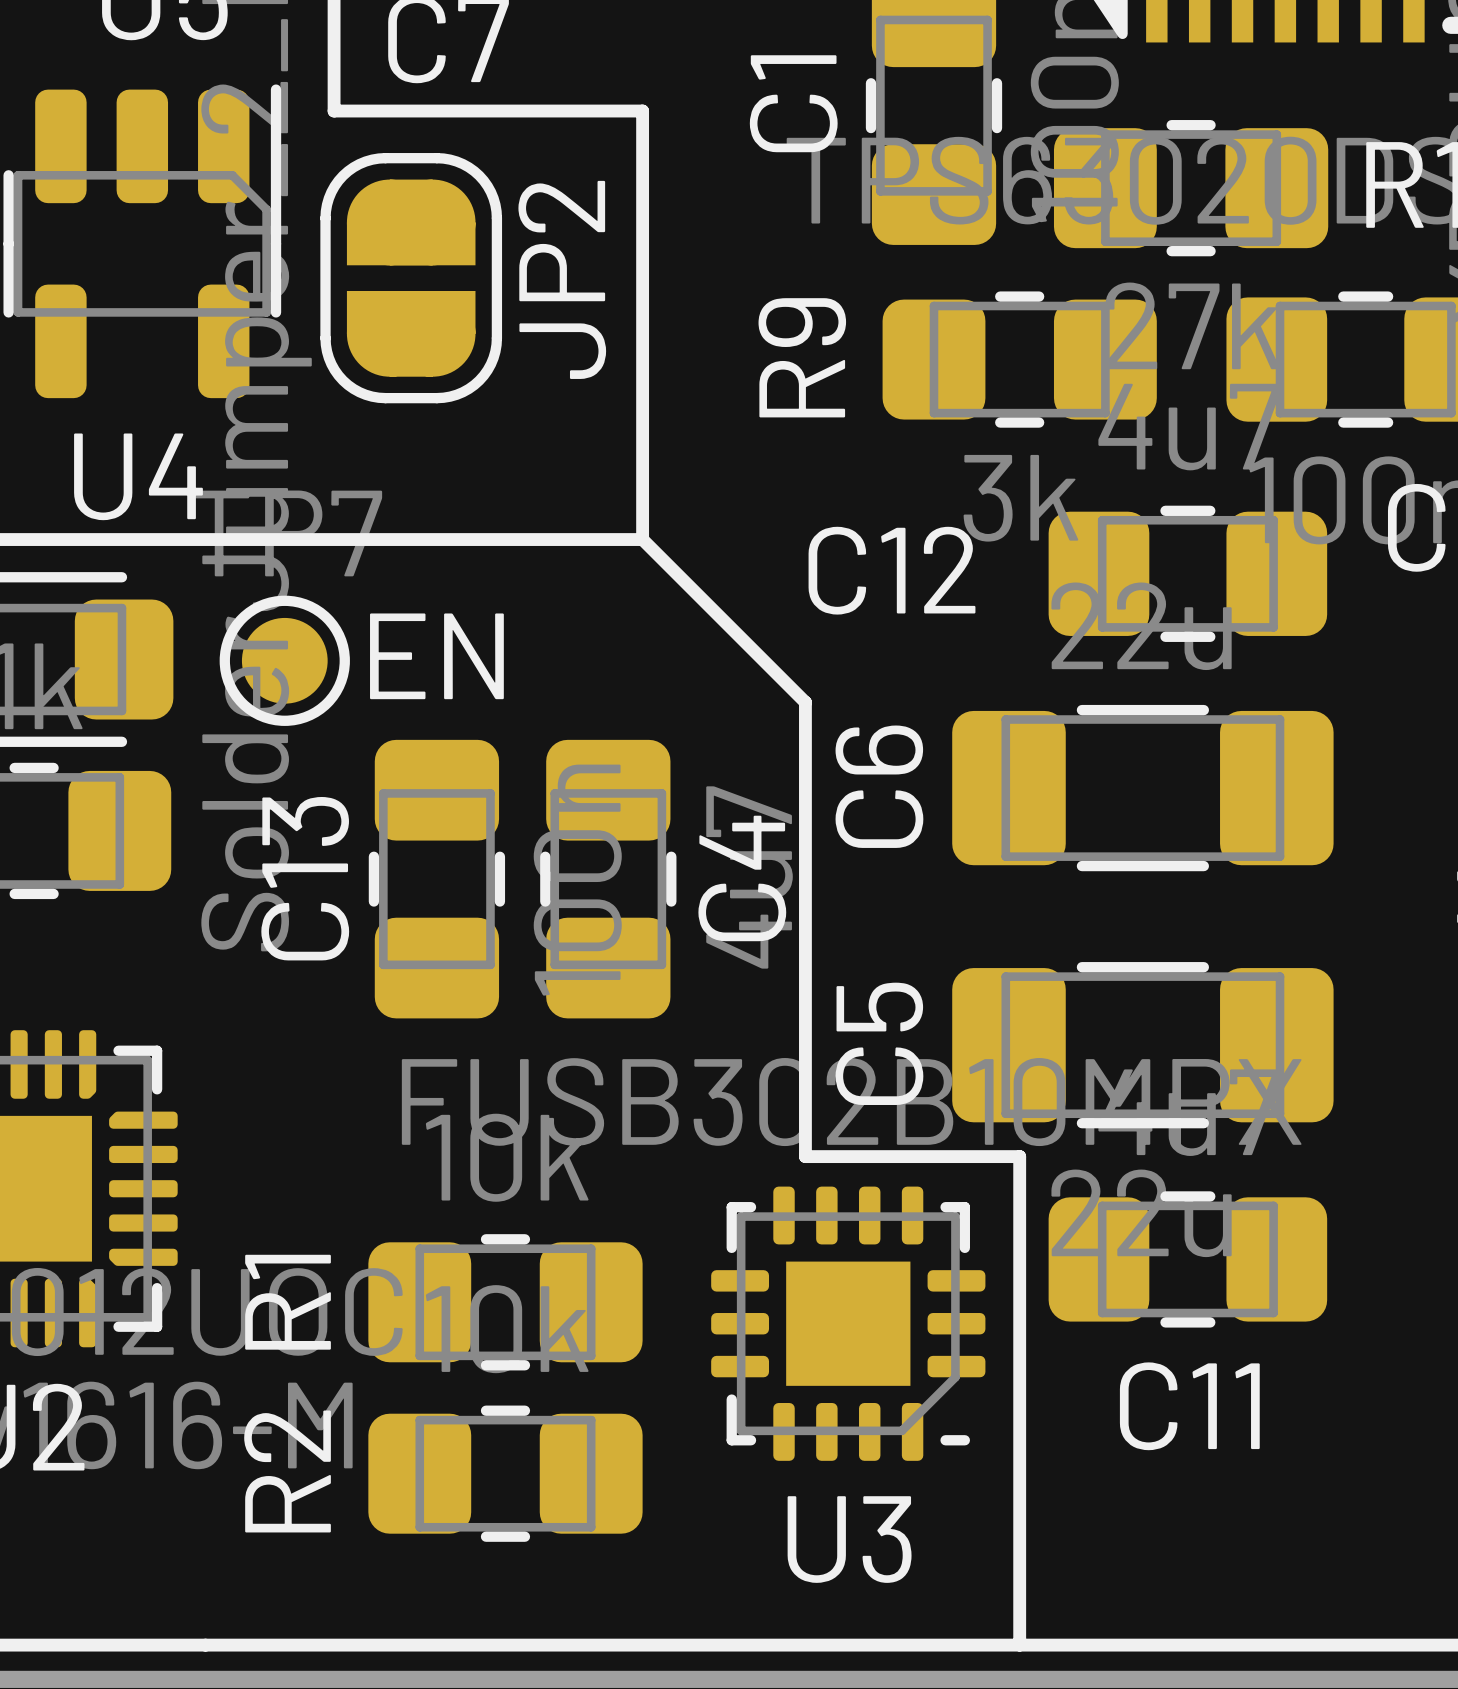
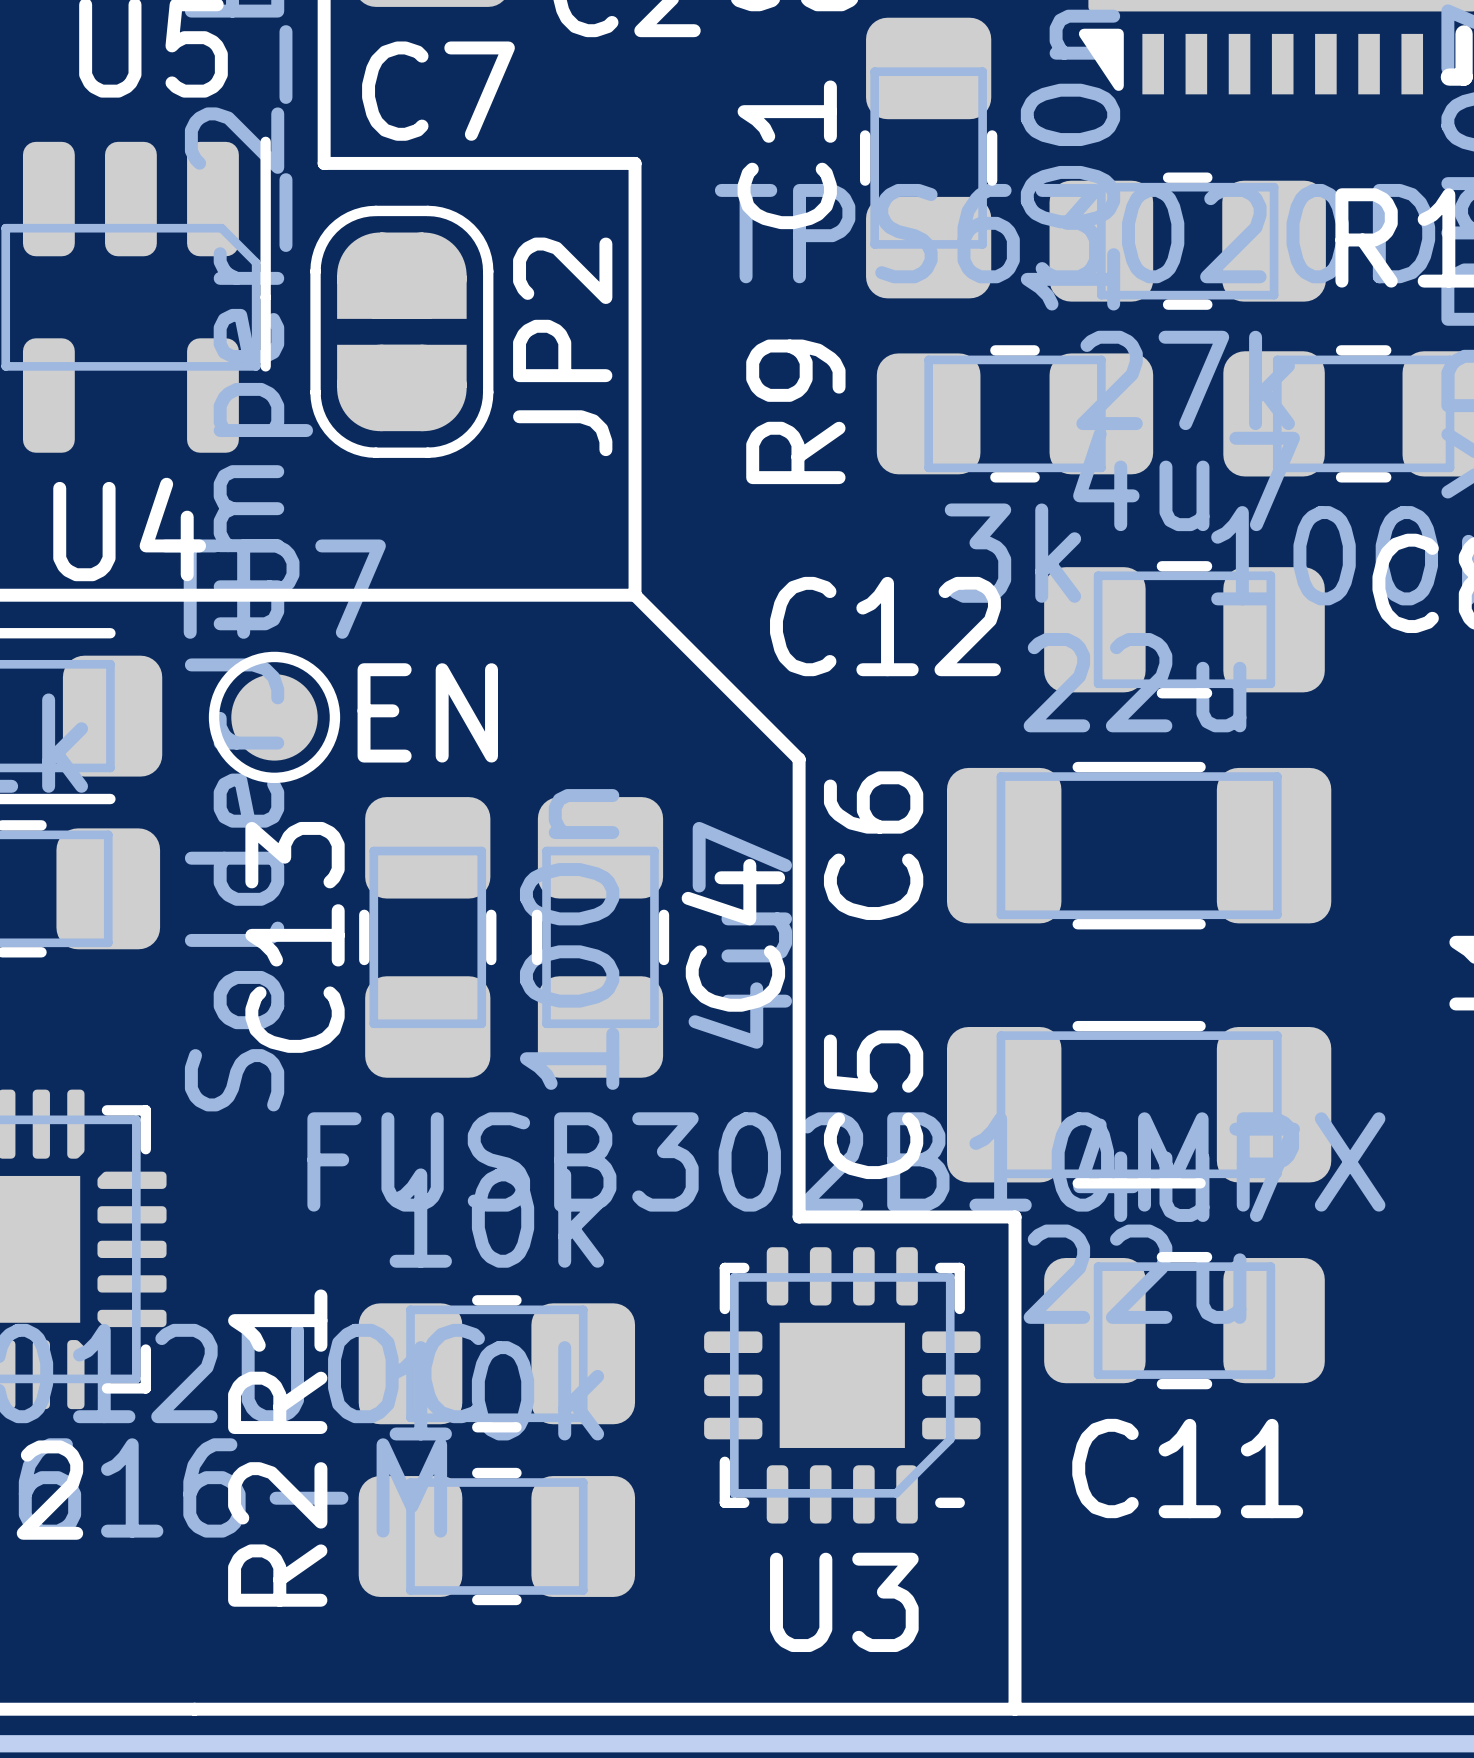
JP2 name position: JP2 (562, 279) -> JP2 (562, 346)

